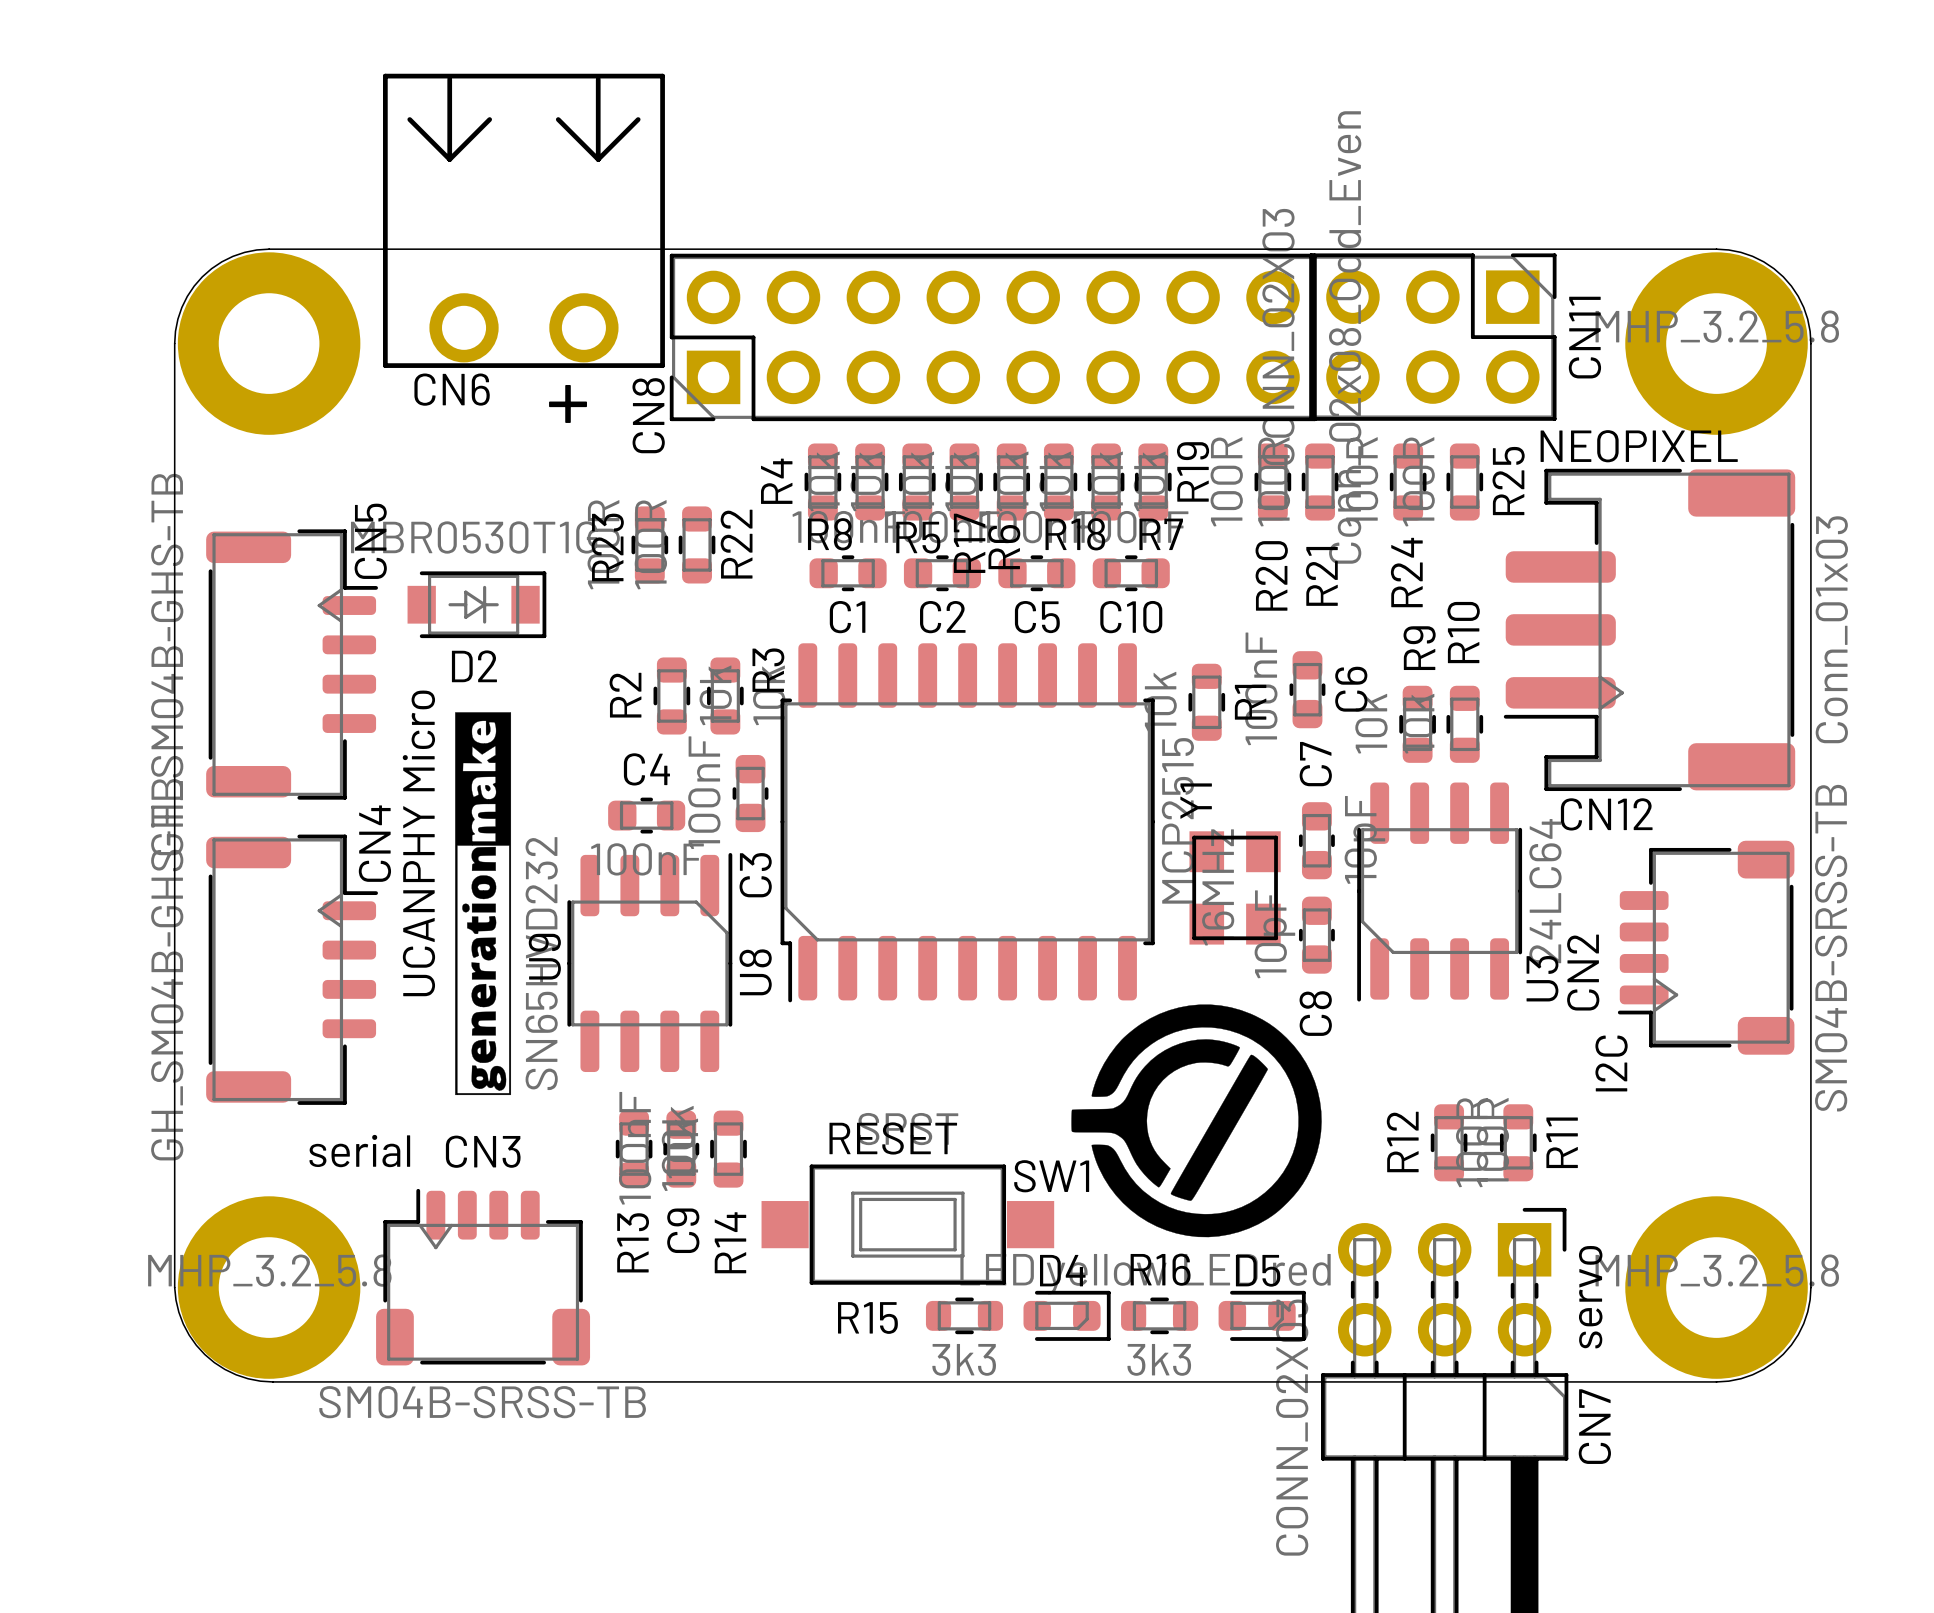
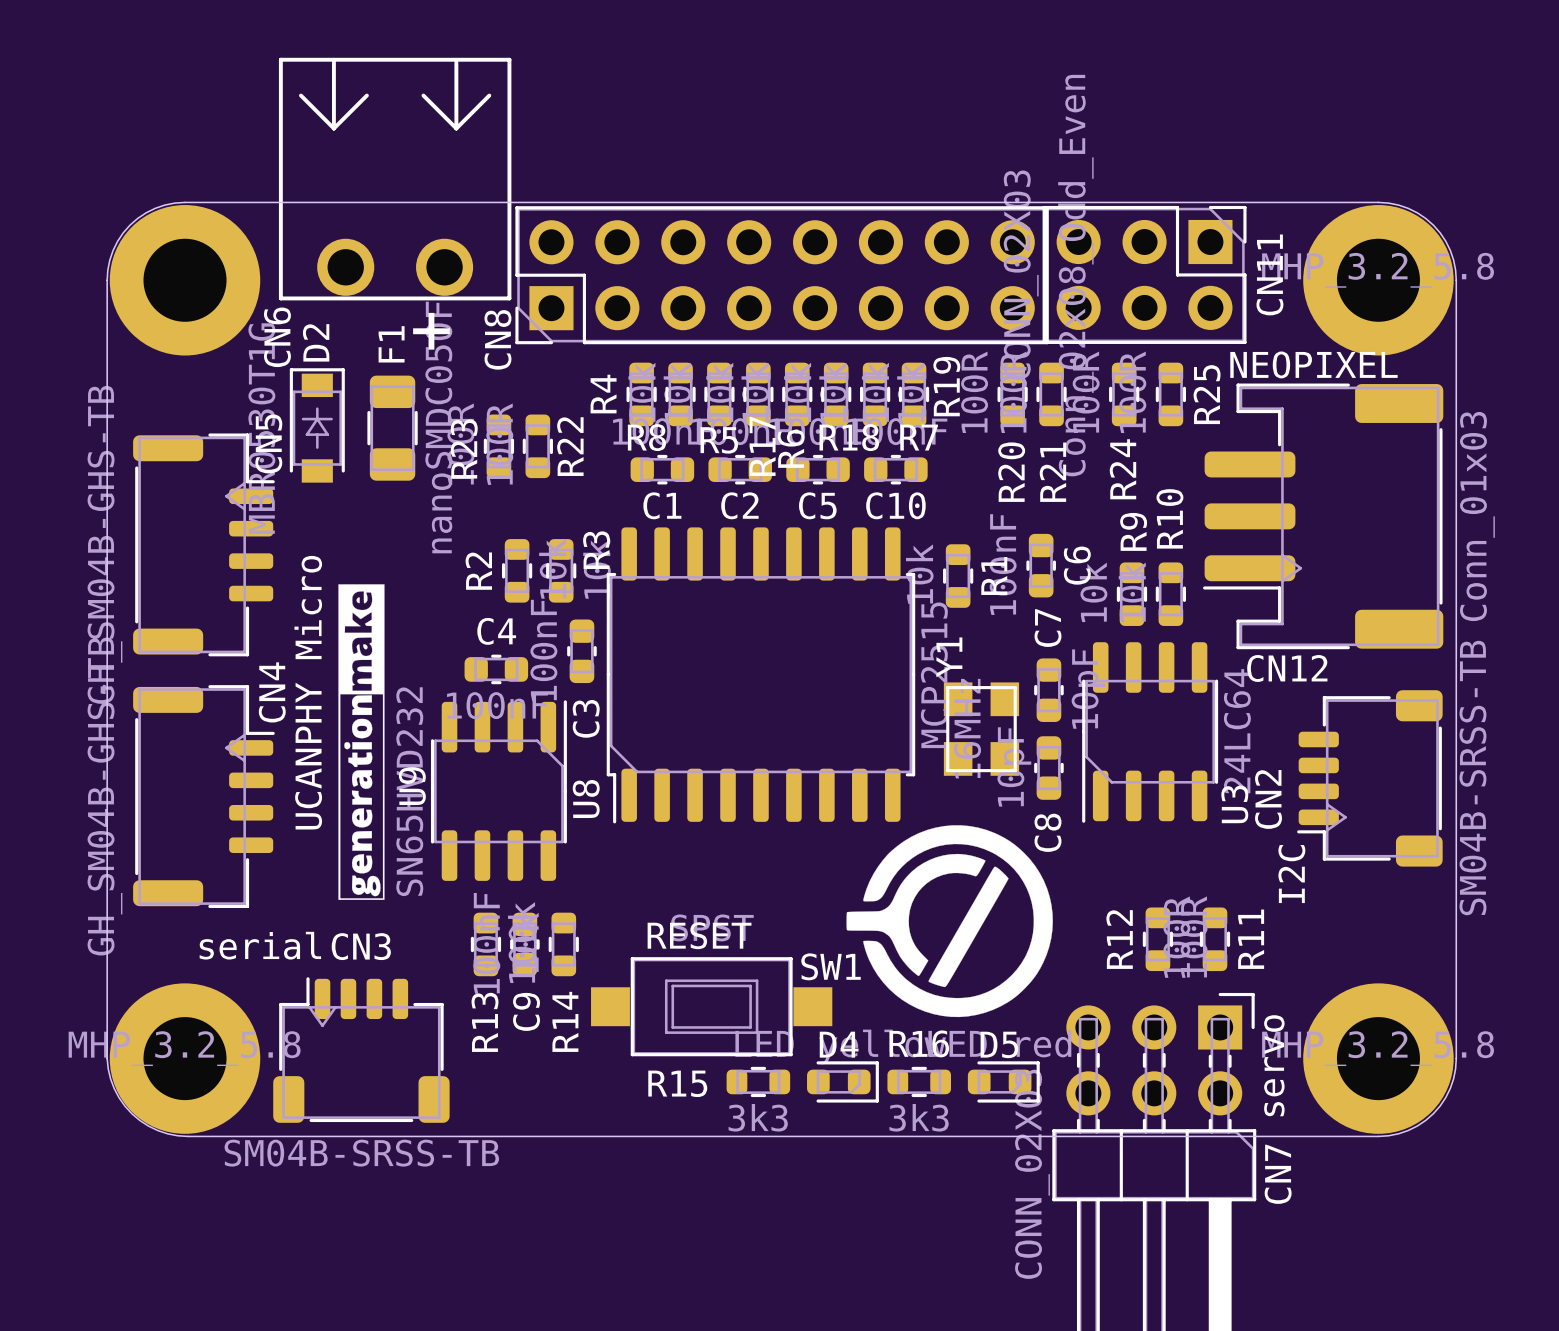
CN6 name rotation: 0° (452, 389) -> 90° counterclockwise (277, 337)
F1: none -> nanoSMDC050F (392, 428)
D2 rotation: 0° (476, 604) -> 90° counterclockwise (317, 425)
D2 position: (476, 604) -> (317, 425)
D2 name position: D2 (474, 666) -> D2 (316, 342)

